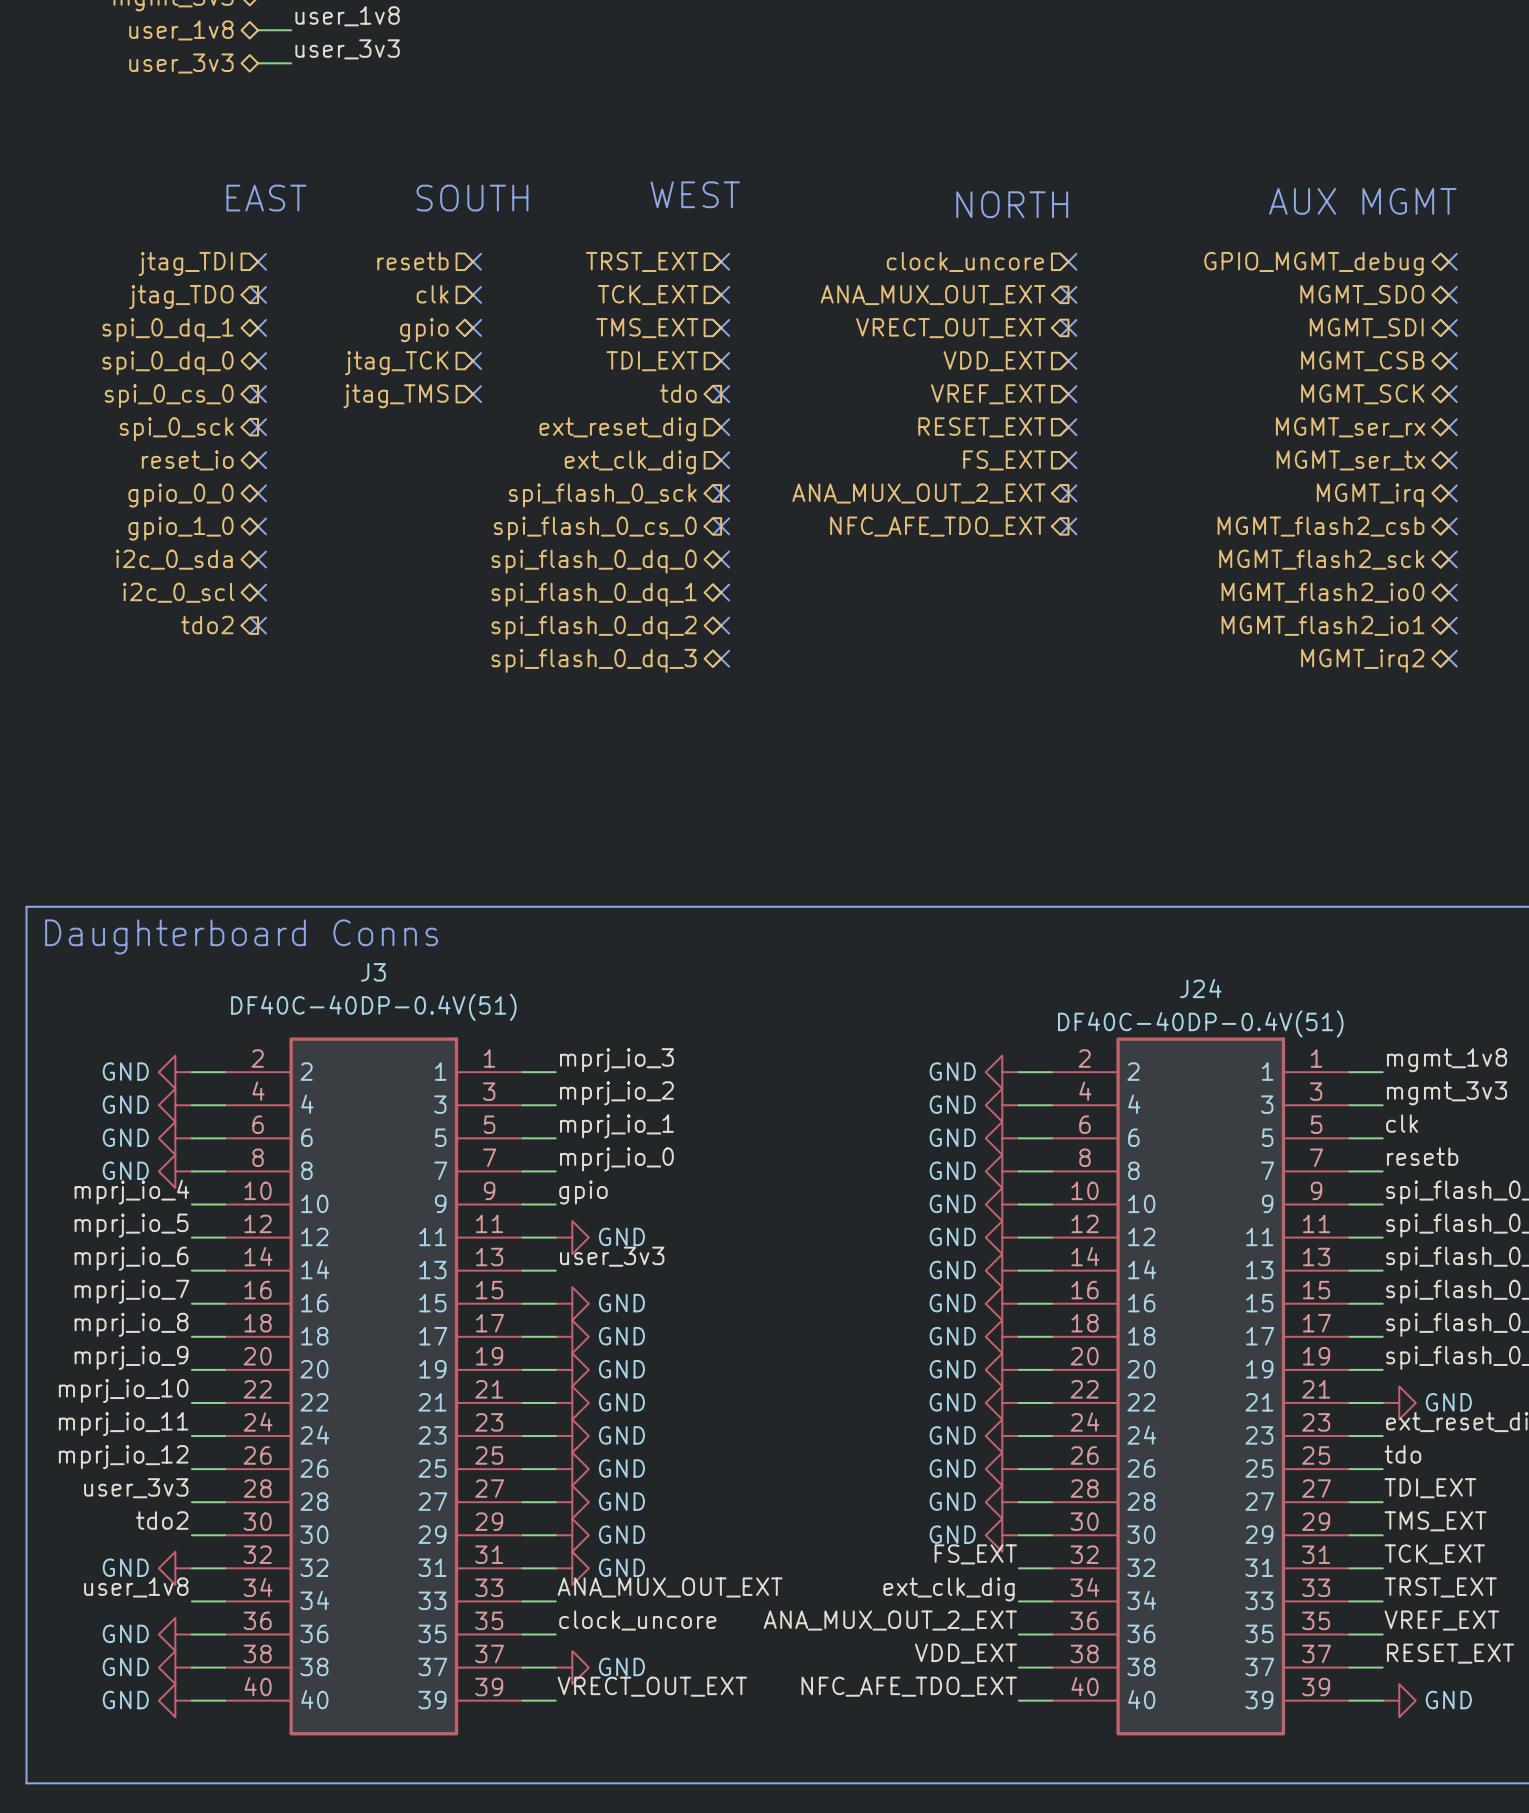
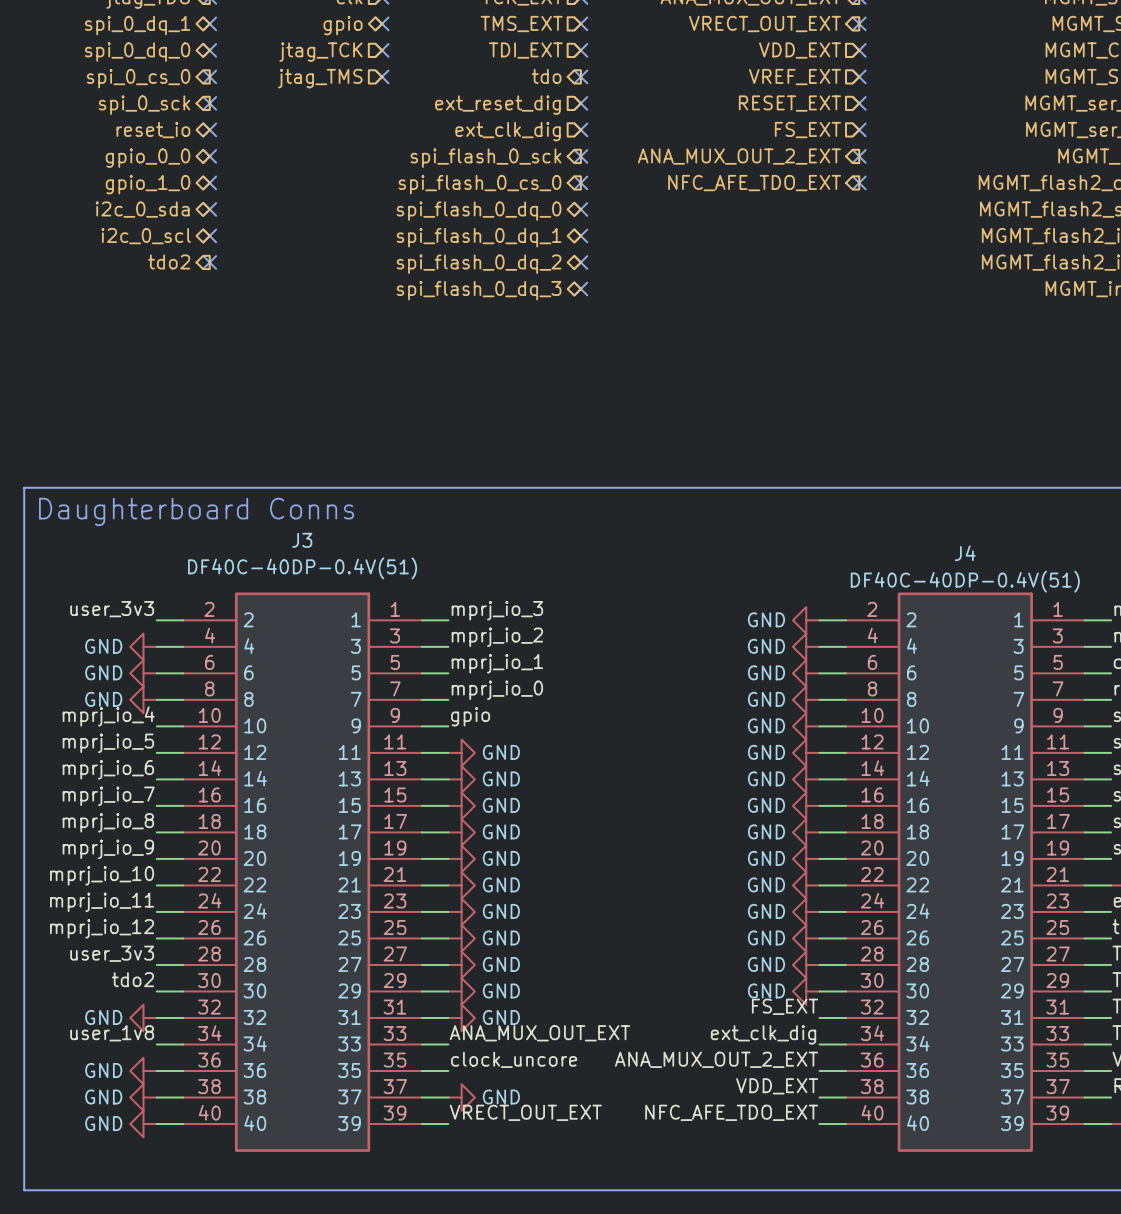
J24 name: J24 (1200, 988) -> J4 (965, 553)
label: none -> user_3v3 (112, 609)
power symbol: GND (175, 1072) -> none
label: user_3v3 (612, 1256) -> none
power symbol: none -> GND (461, 779)

